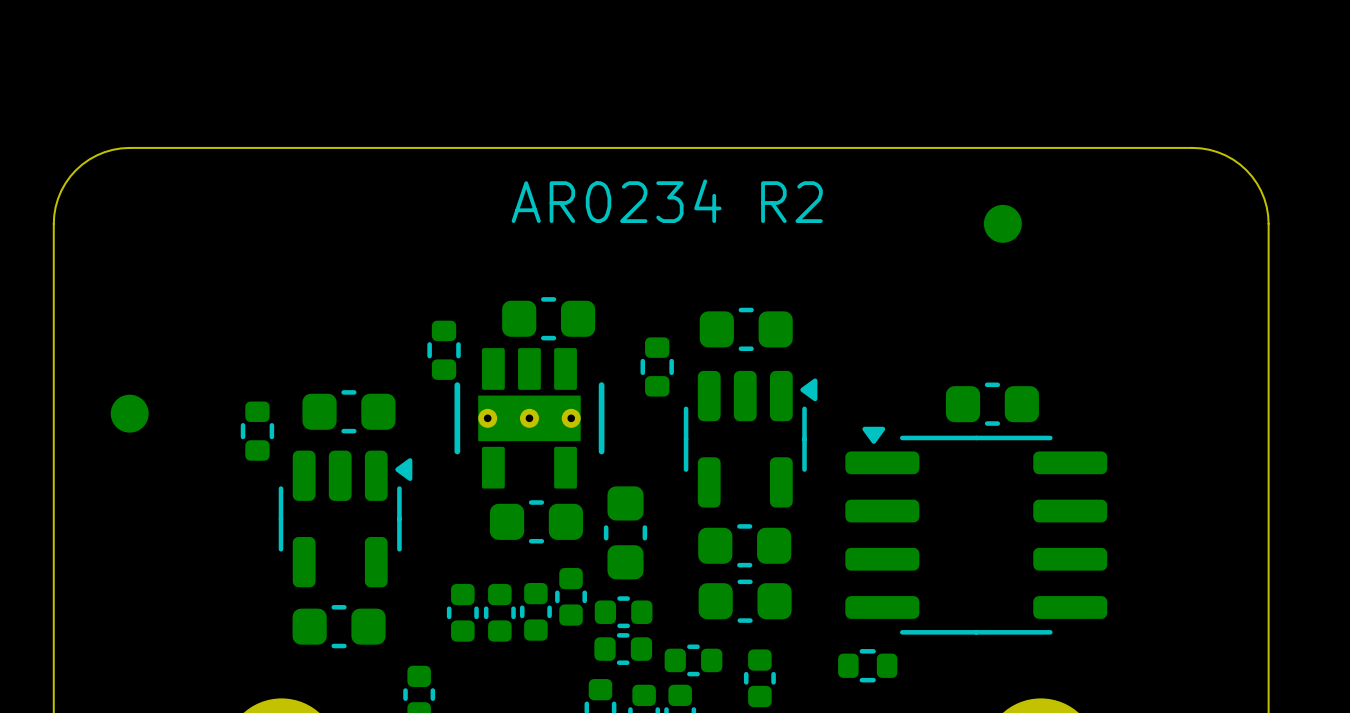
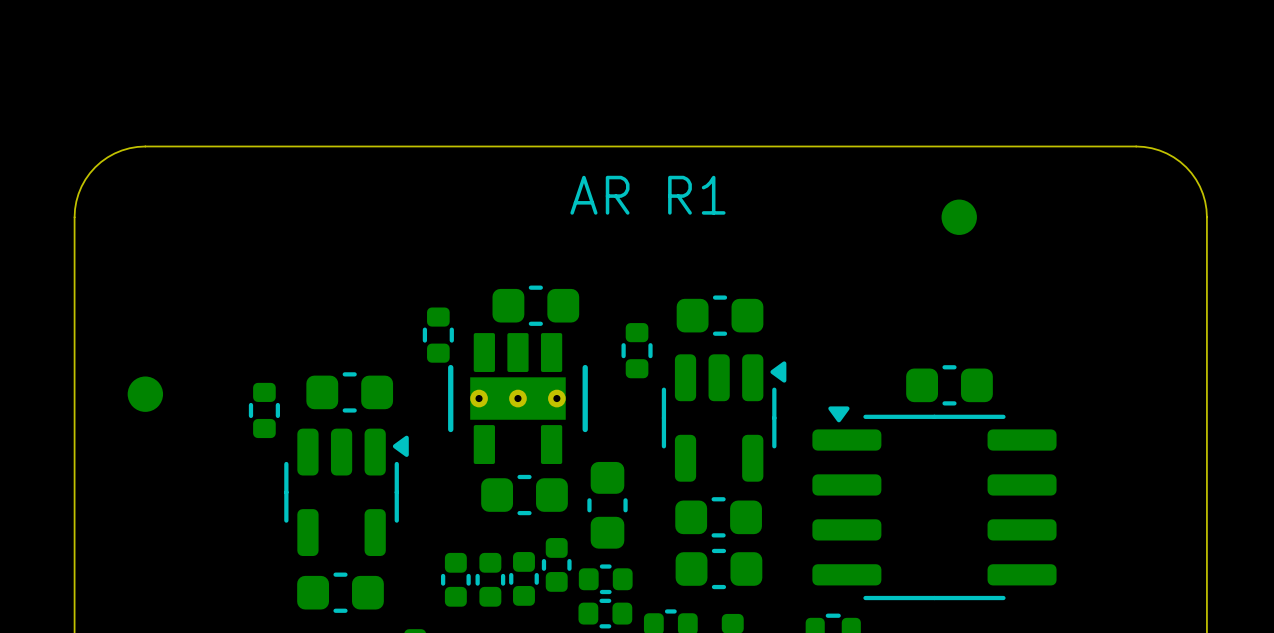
text: none -> AR R1 (647, 195)
text: AR0234 R2 (667, 201) -> none

